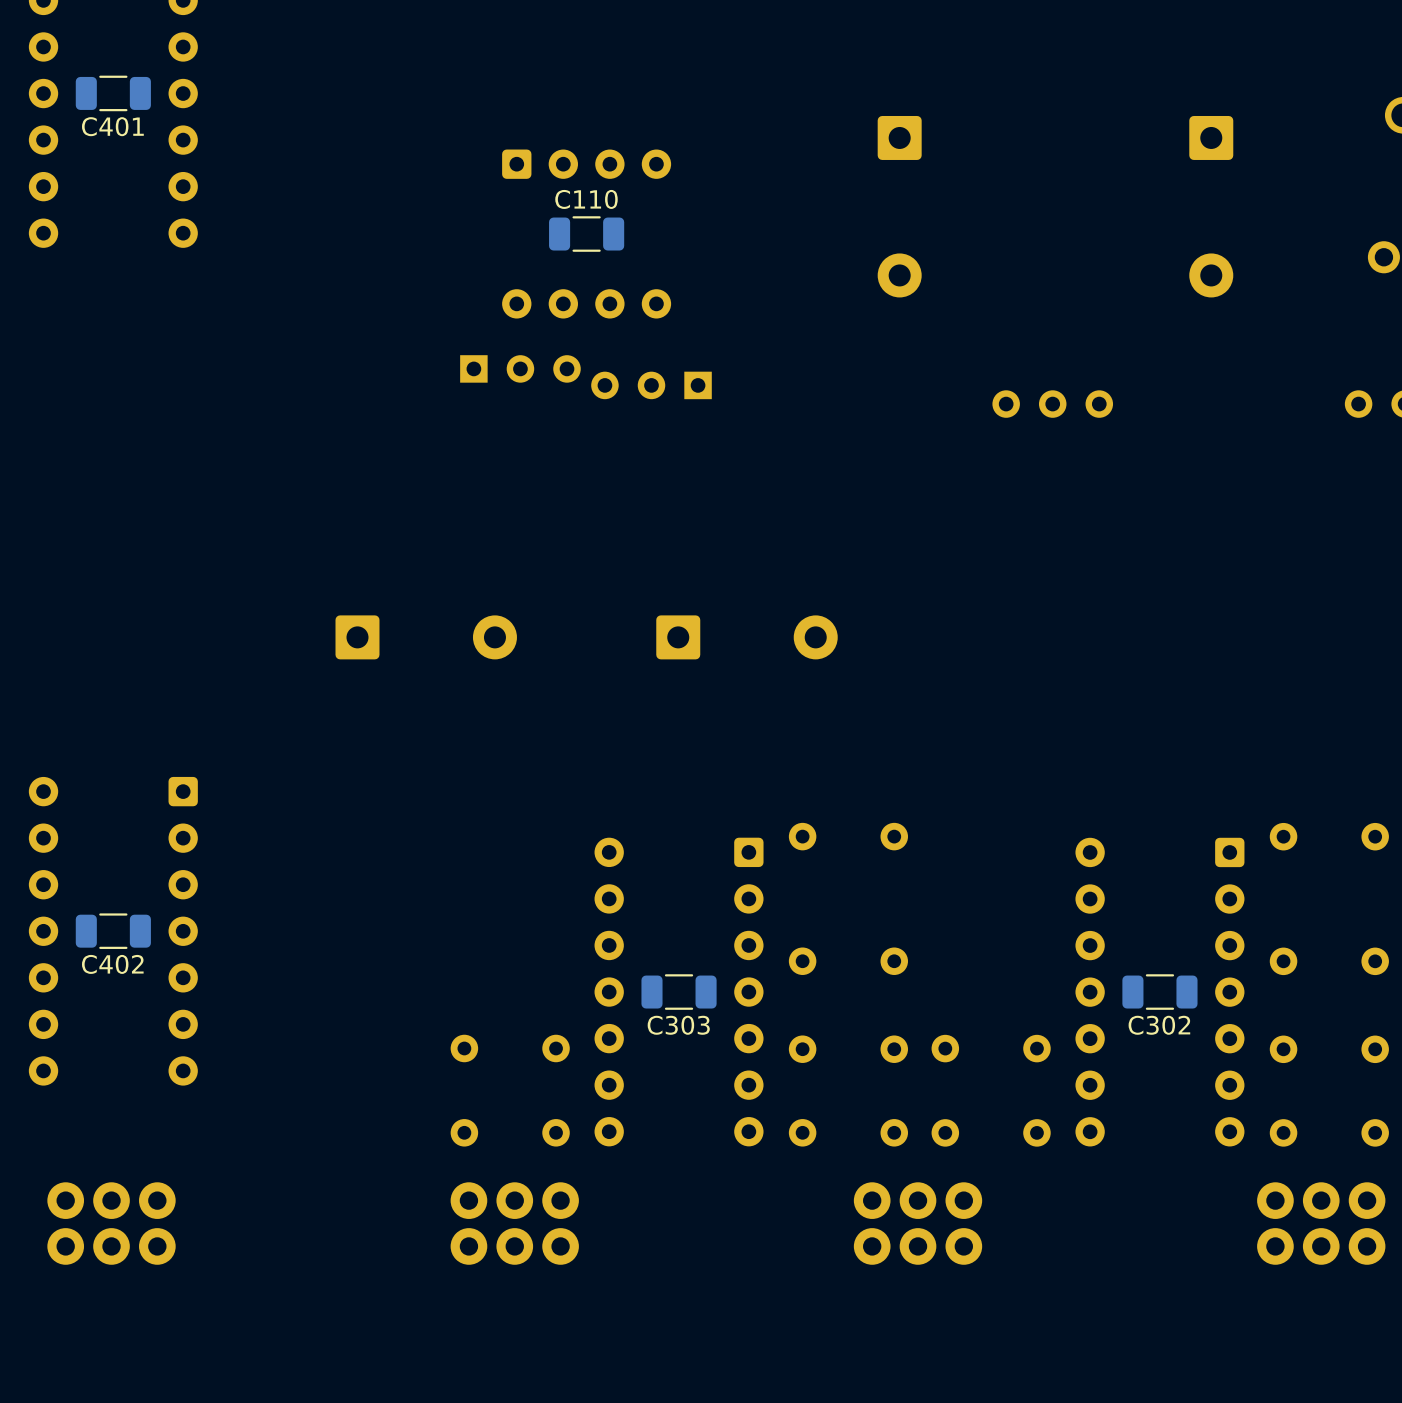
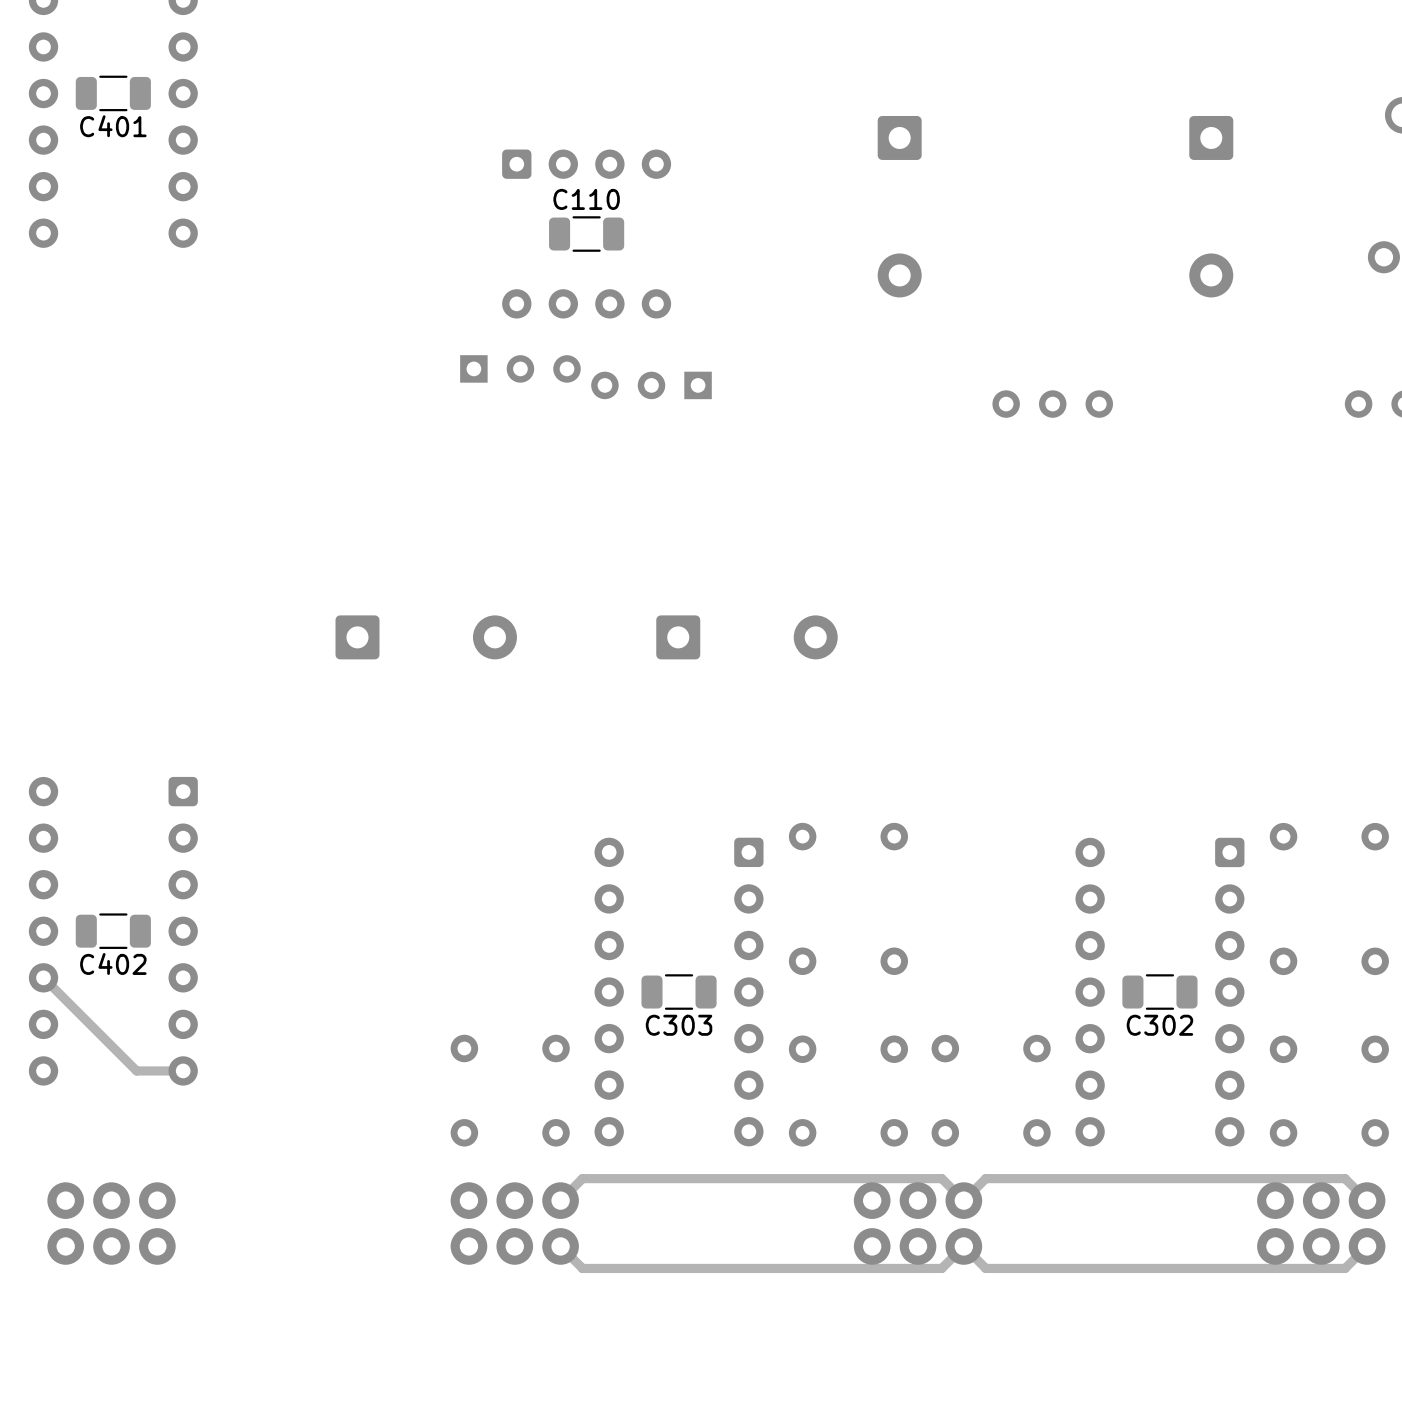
track: none -> (43, 977) (136, 1070) (183, 1070)
track: none -> (1367, 1200) (1345, 1178) (985, 1178) (963, 1200) (941, 1178) (582, 1178) (560, 1200)
track: none -> (1367, 1246) (1345, 1268) (985, 1268) (963, 1246) (941, 1268) (582, 1268) (560, 1246)

